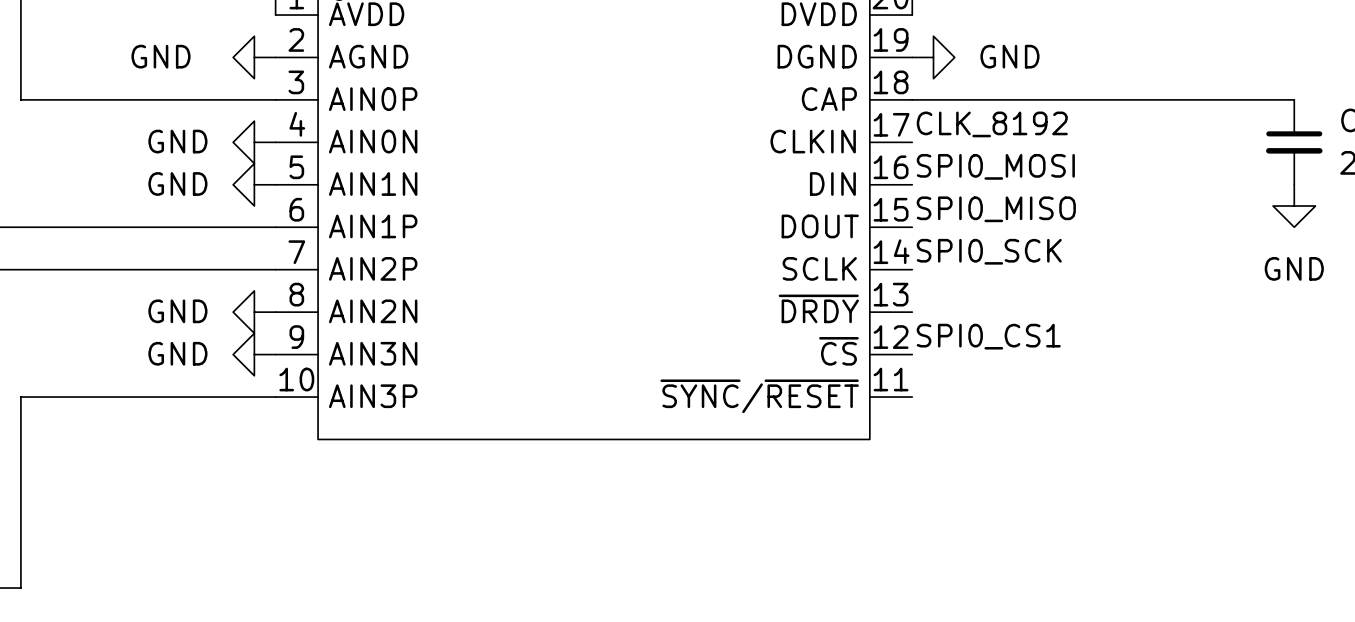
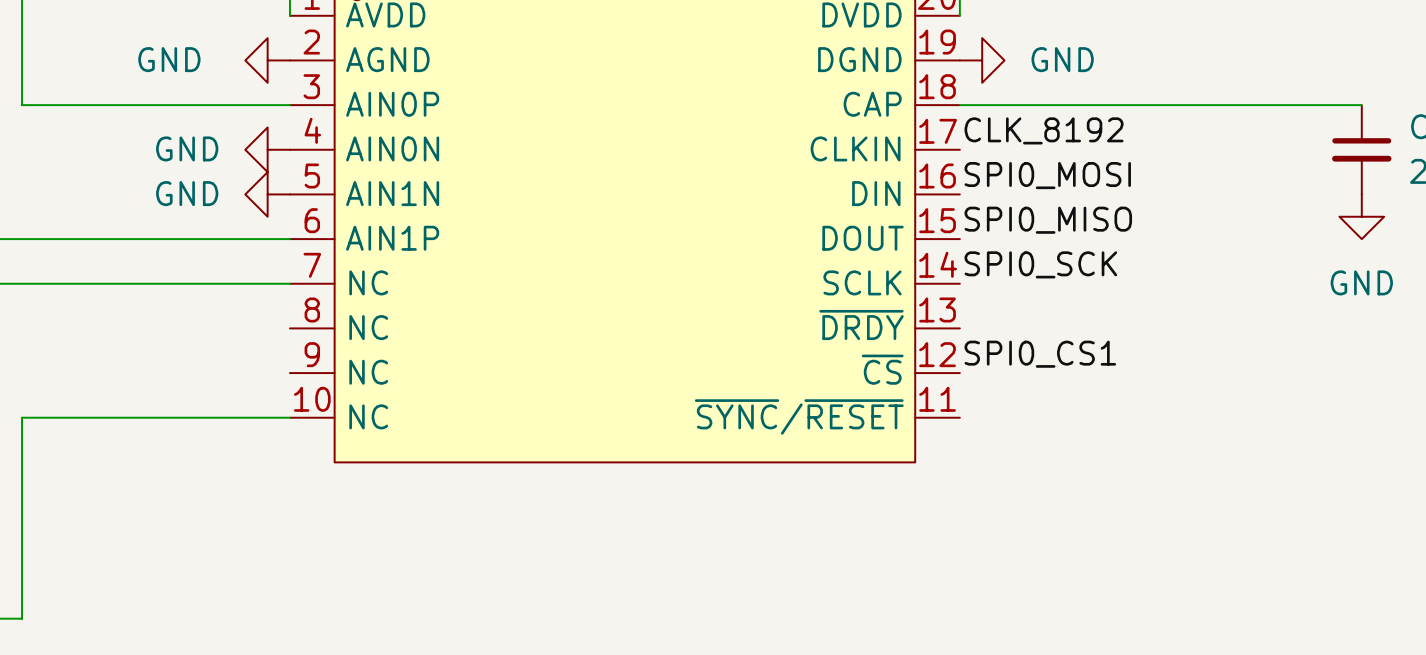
part pin name: AIN2P (373, 268) -> NC (368, 282)
part pin name: AIN2N (373, 311) -> NC (368, 327)
power symbol: GND (254, 312) -> none
part pin name: AIN3N (373, 353) -> NC (368, 372)
power symbol: GND (254, 354) -> none
part pin name: AIN3P (373, 396) -> NC (368, 416)

